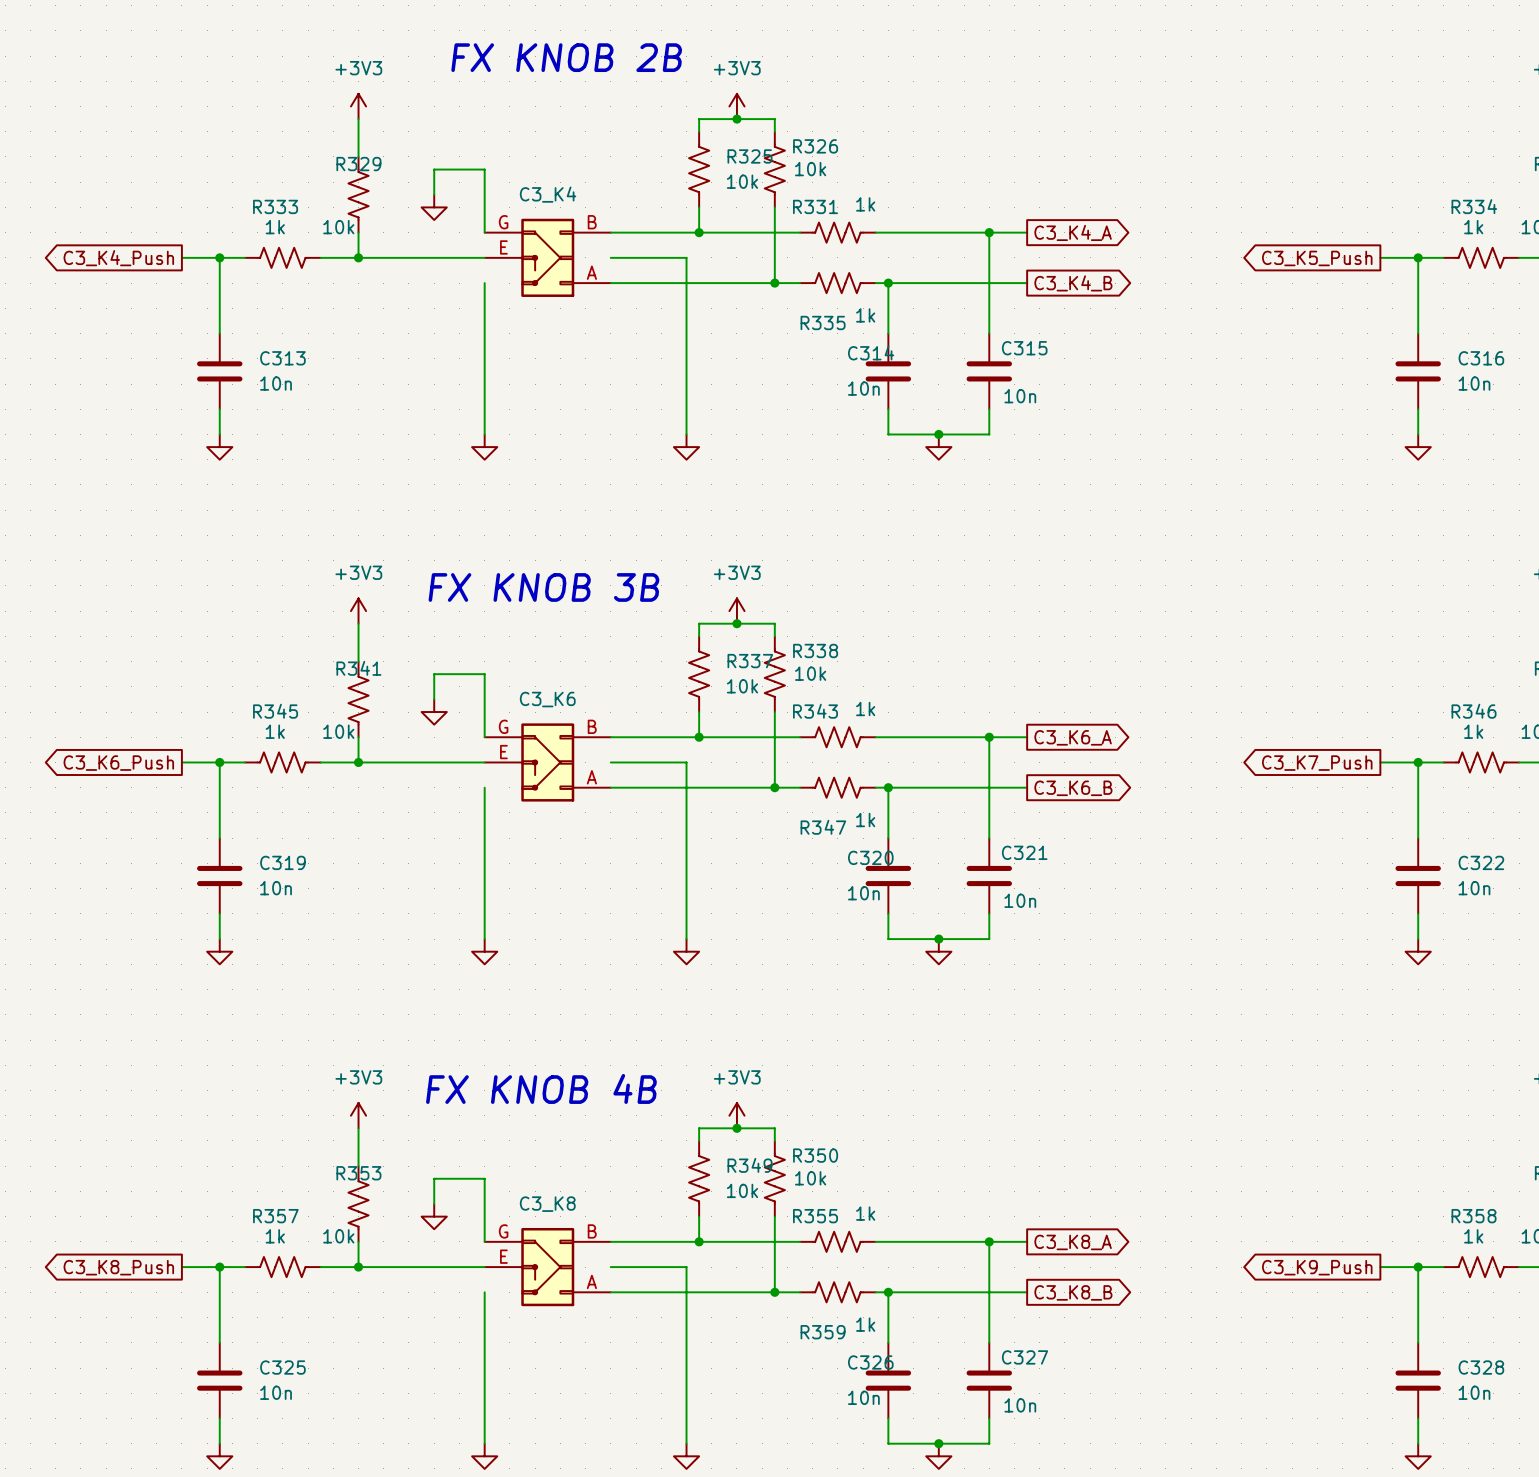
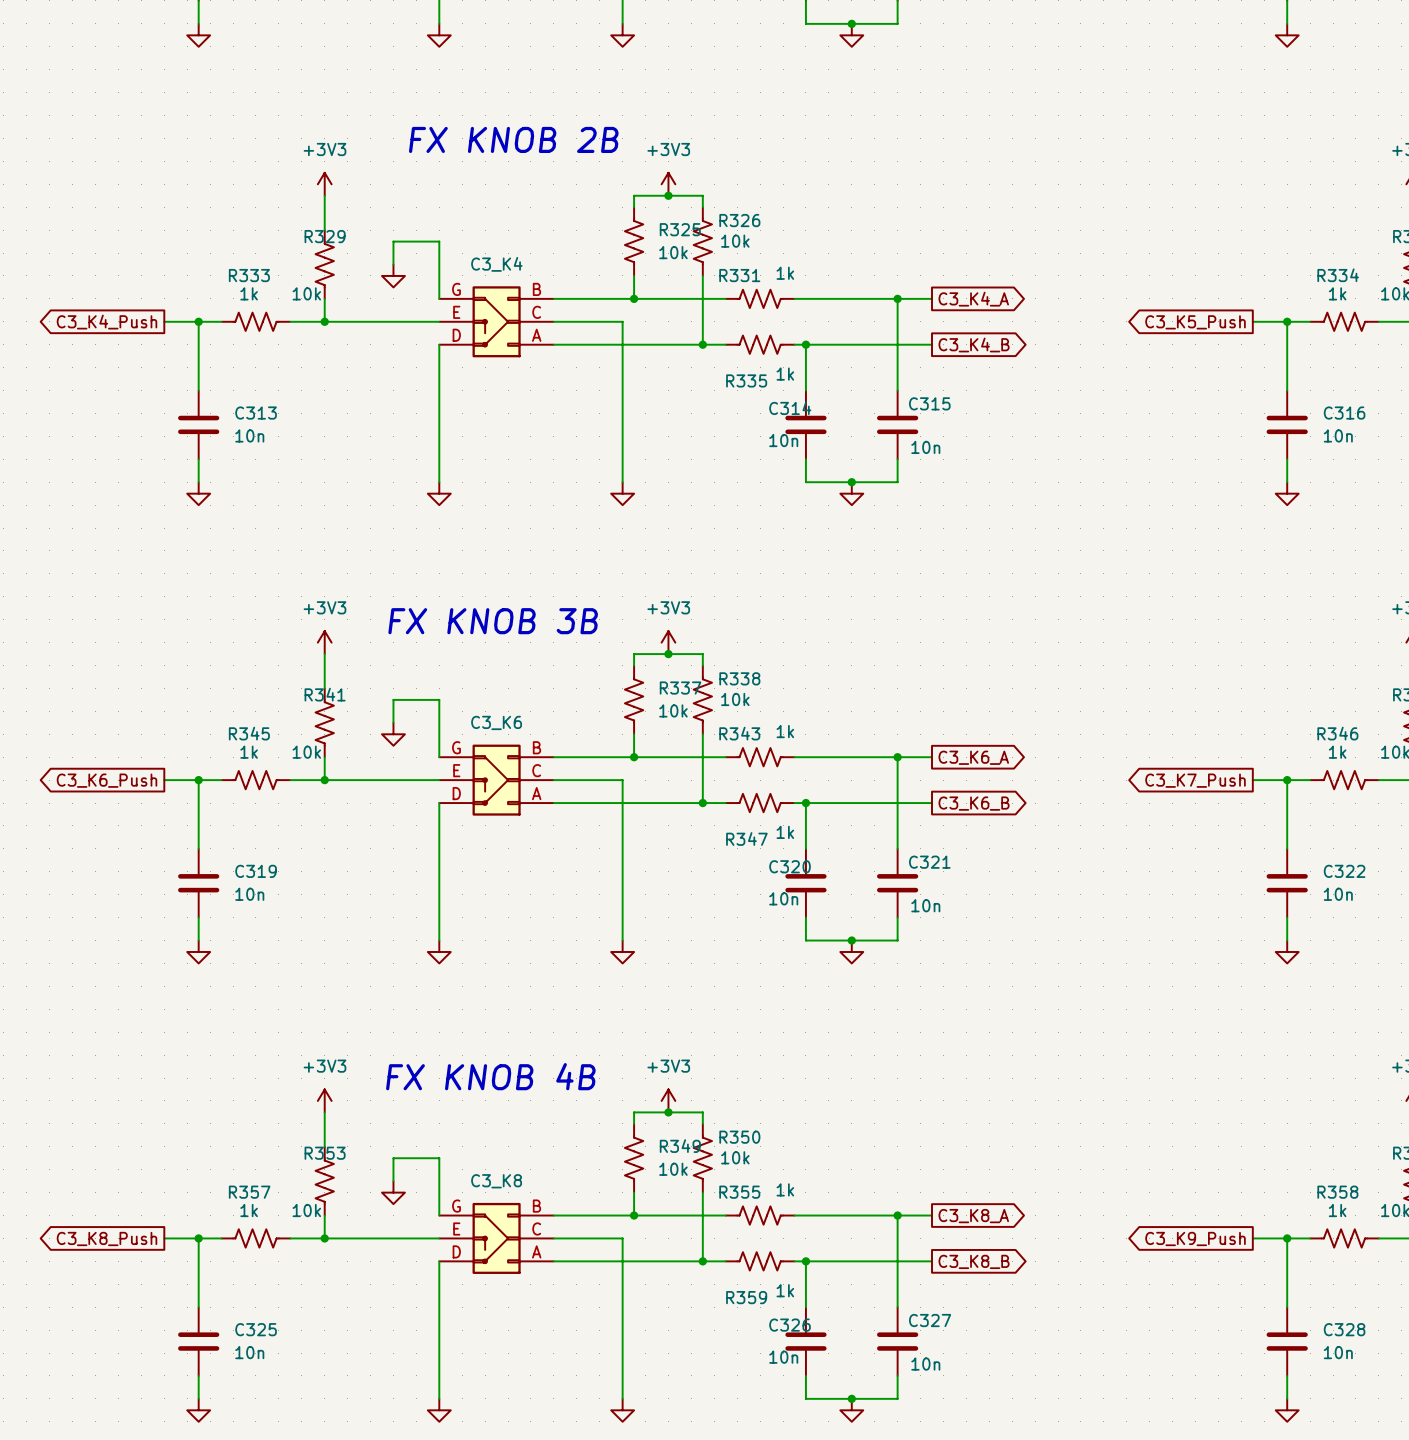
part symbol: [484, 218, 611, 297] -> [439, 286, 554, 358]
part symbol: [484, 723, 611, 802] -> [439, 744, 554, 816]
part symbol: [484, 1227, 611, 1307] -> [439, 1202, 554, 1274]

